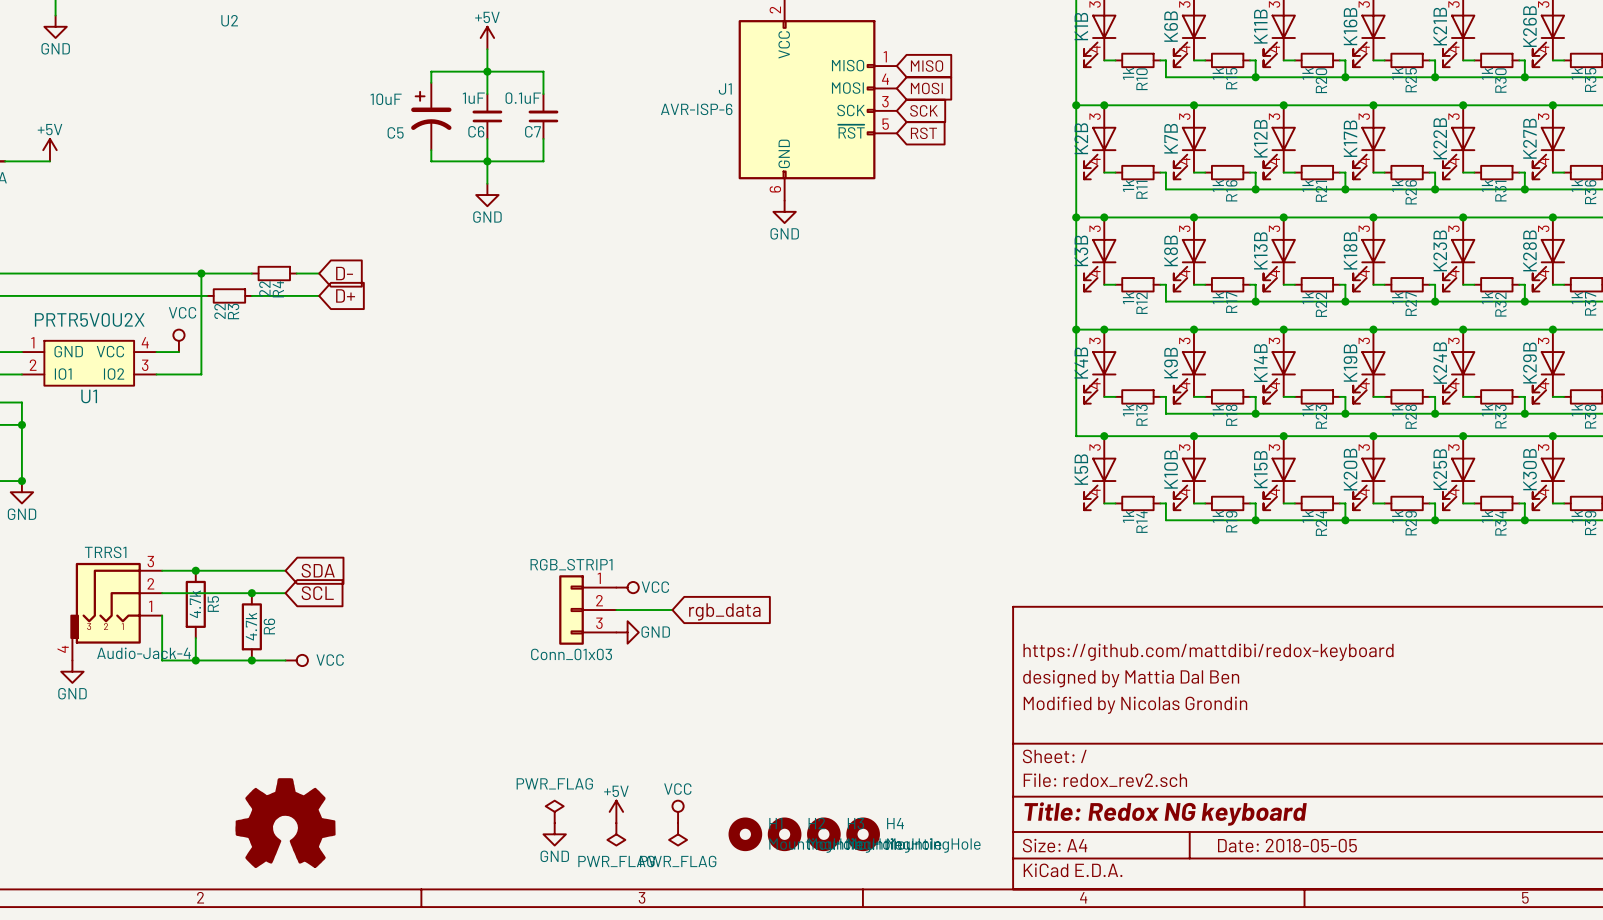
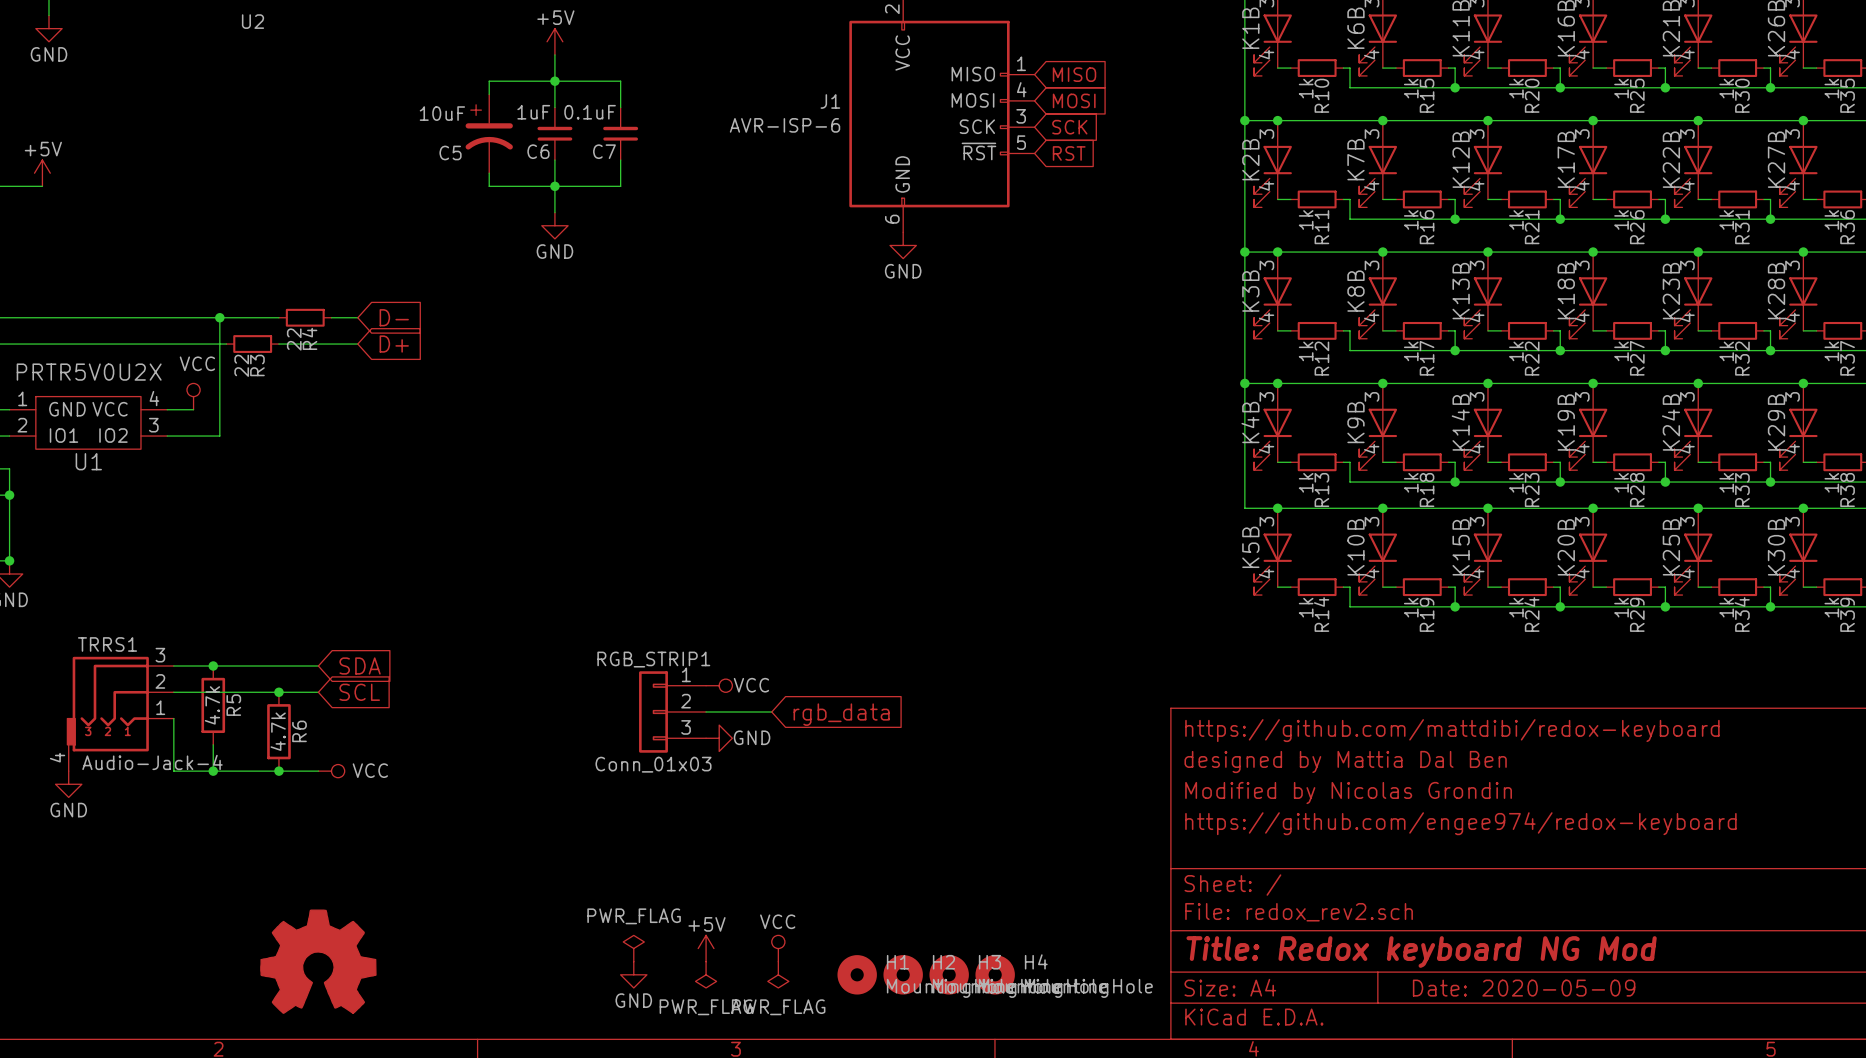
title block: none -> https://github.com/mattdibi/redox-keyboard (1452, 730)
title block: https://github.com/mattdibi/redox-keyboard (1208, 652) -> designed by Mattia Dal Ben (1345, 761)
title block: designed by Mattia Dal Ben (1131, 678) -> Modified by Nicolas Grondin (1348, 793)
title block: Modified by Nicolas Grondin (1135, 705) -> https://github.com/engee974/redox-keyboard (1460, 823)
title block: Title: Redox NG keyboard (1165, 814) -> Title: Redox keyboard NG Mod (1421, 952)
title block: Date: 2018-05-05 (1287, 845) -> Date: 2020-05-09 (1524, 988)

